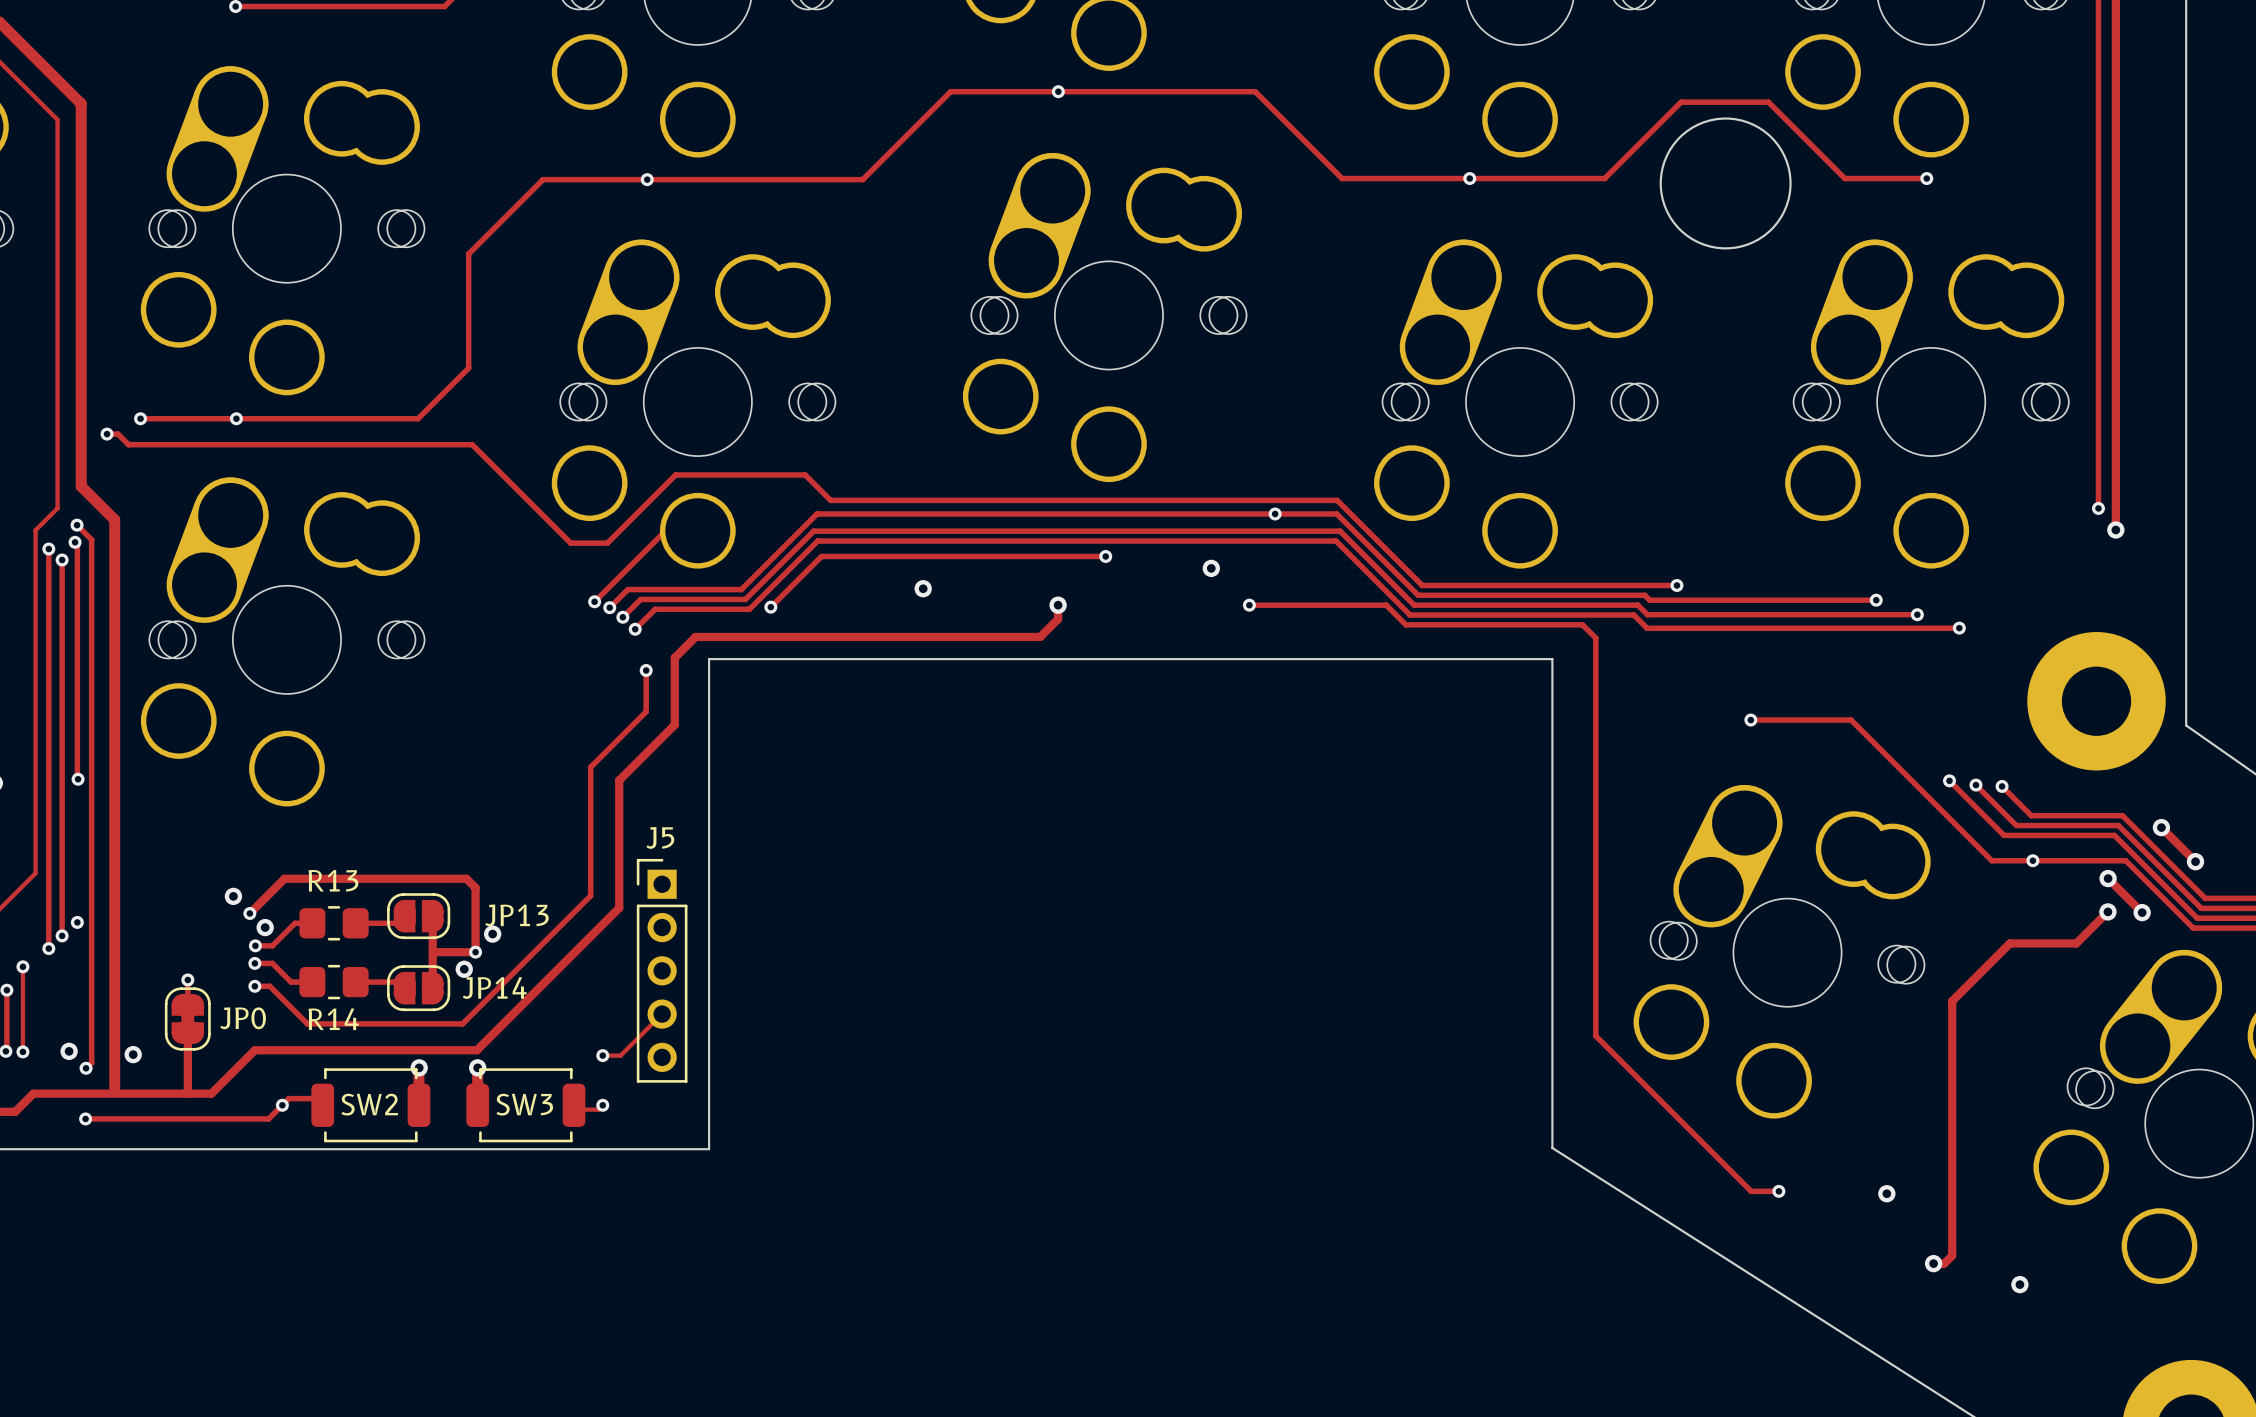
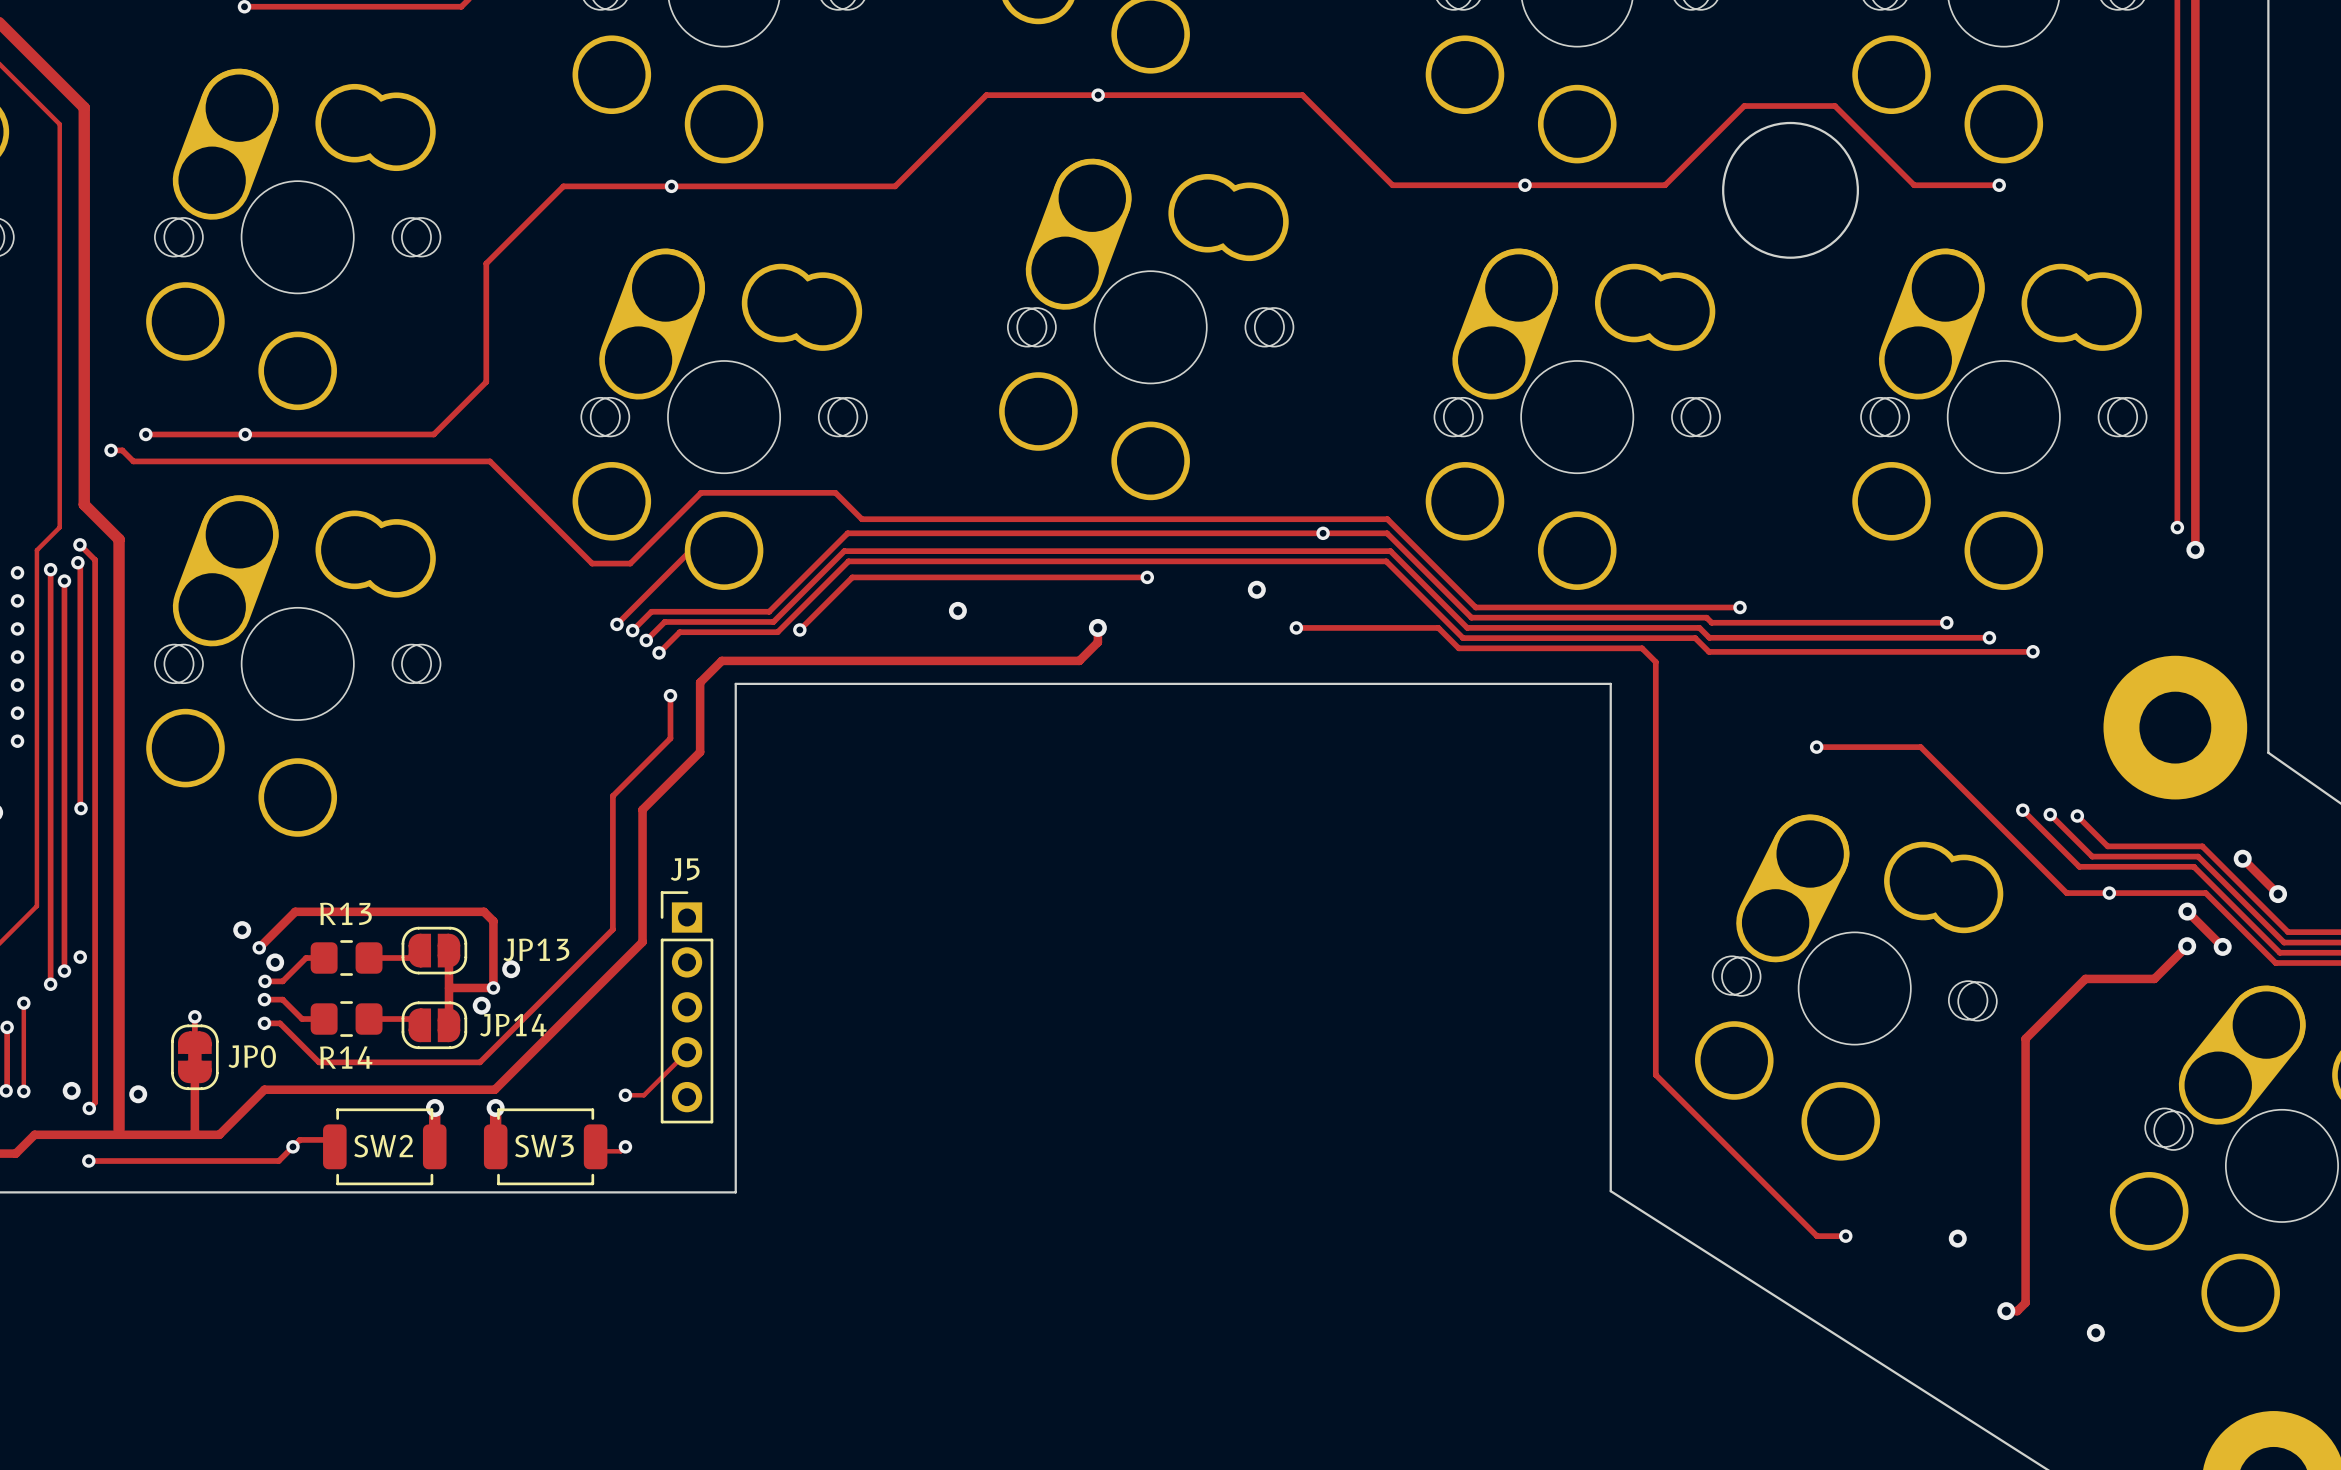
via: none -> (17, 572)
via: none -> (17, 600)
via: none -> (17, 628)
via: none -> (17, 657)
via: none -> (17, 685)
via: none -> (17, 713)
via: none -> (17, 741)

